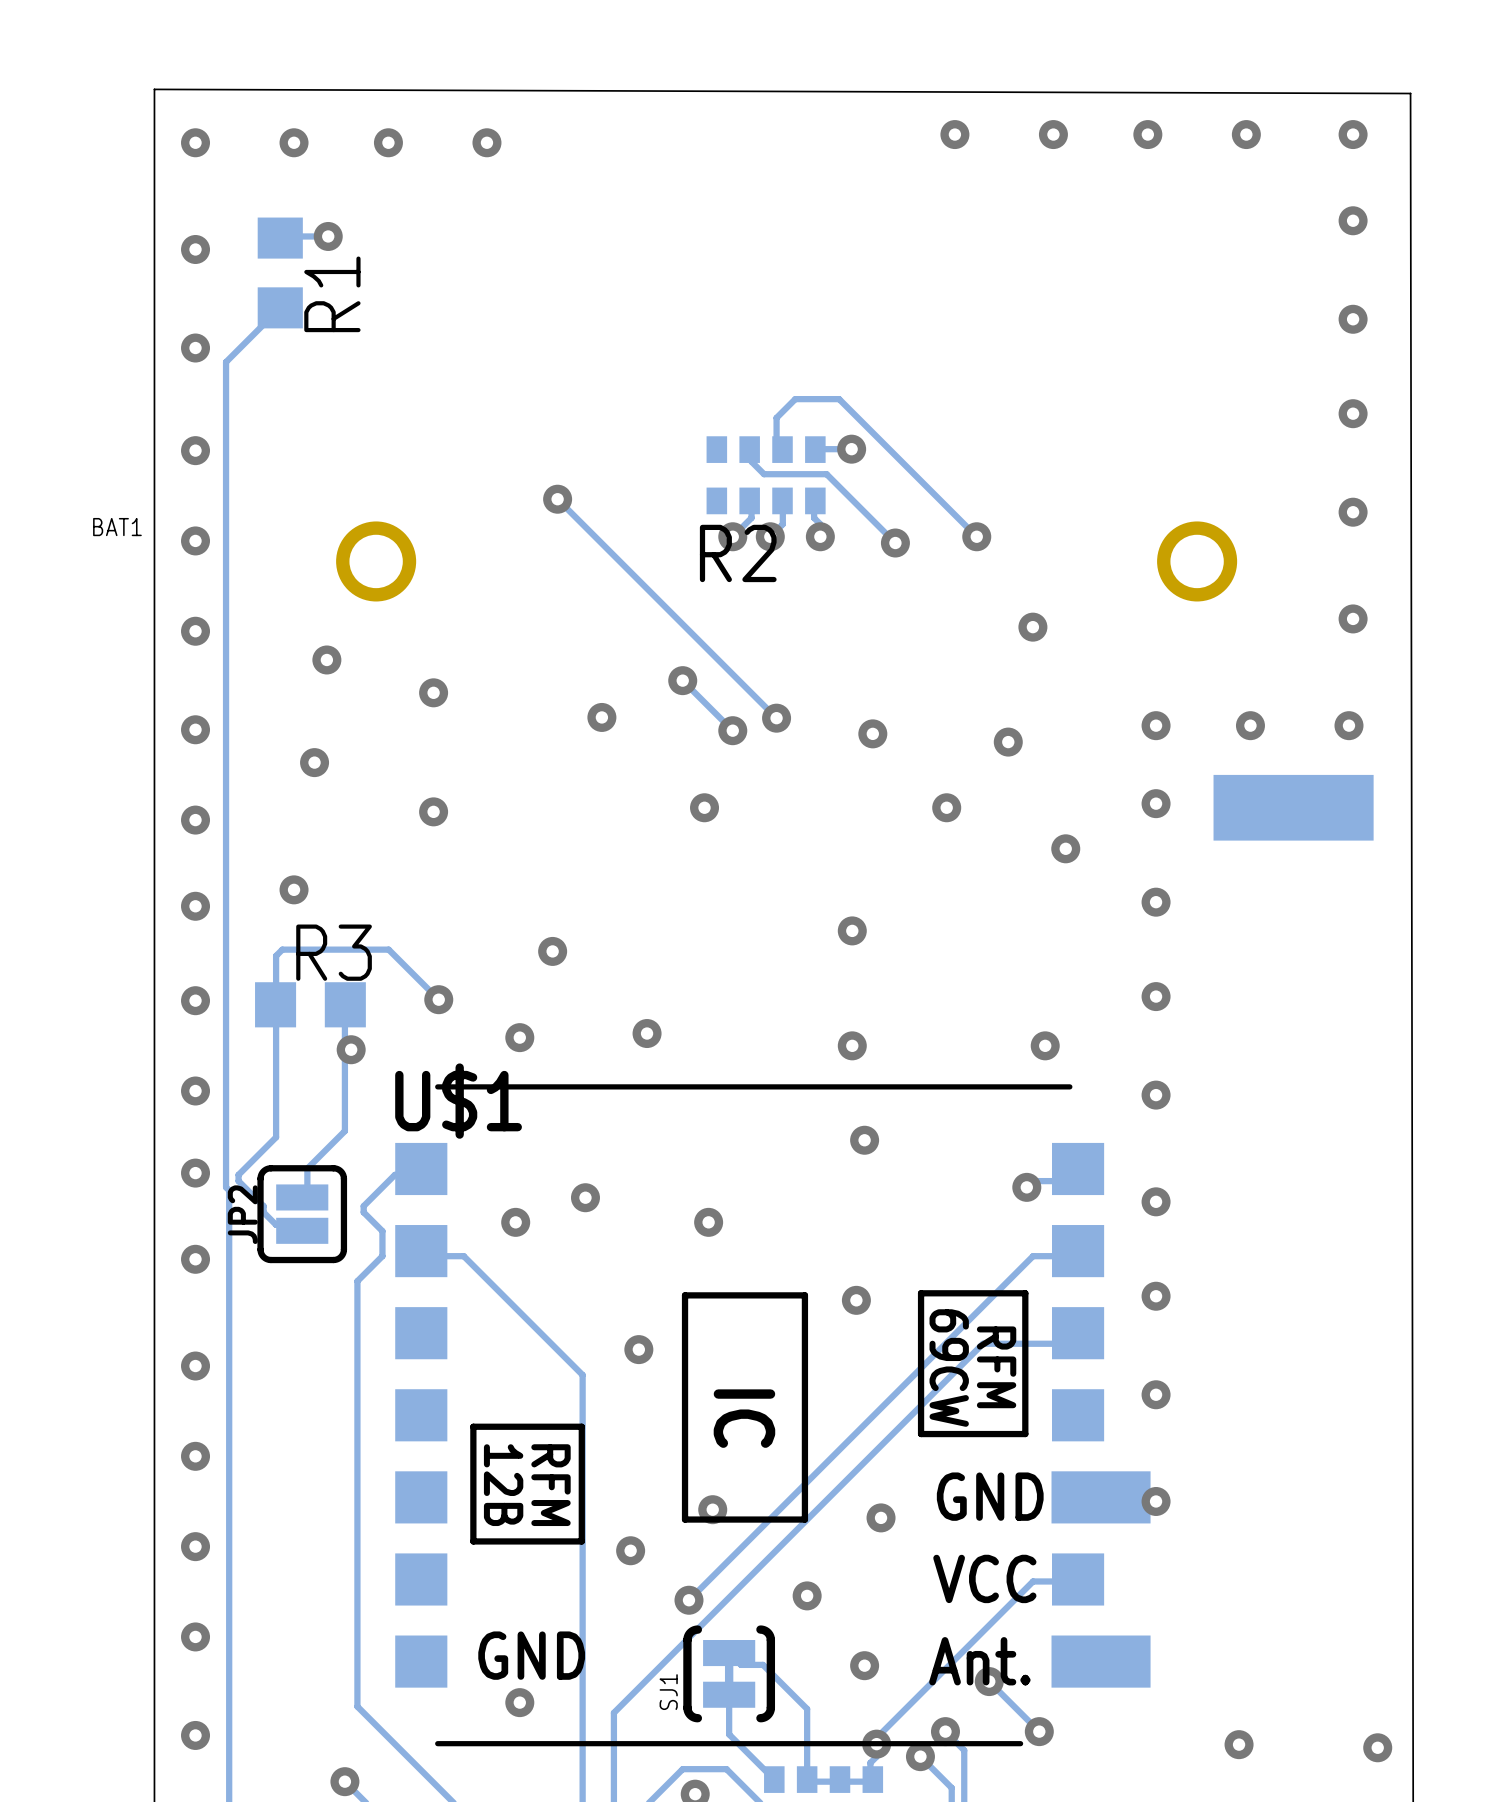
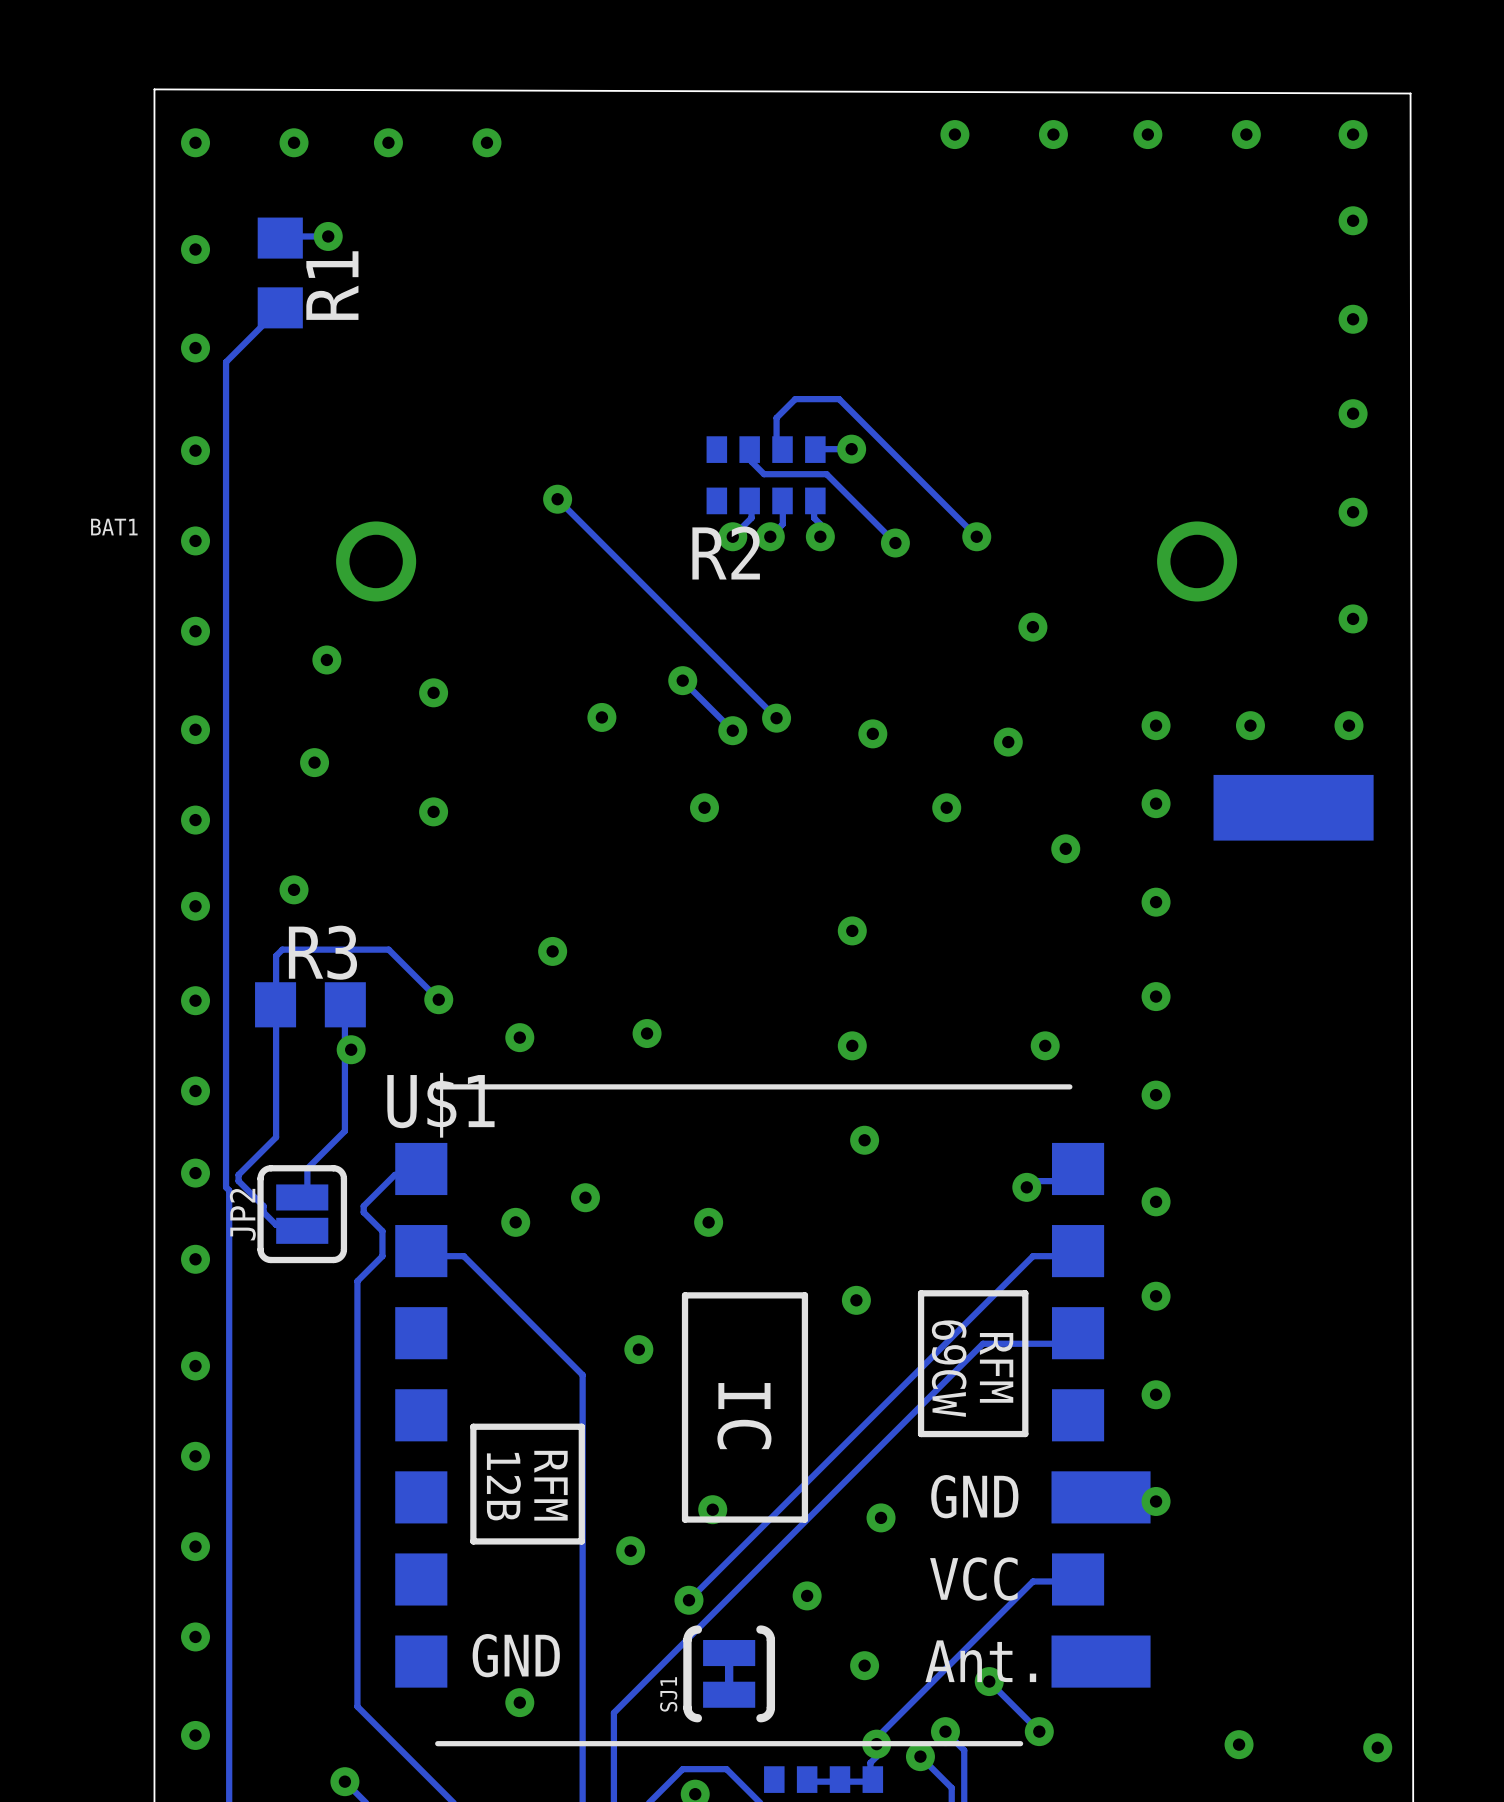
track: (729, 1653) (741, 1664) (763, 1664) (807, 1709) (807, 1779) -> none
track: (729, 1694) (729, 1734) (774, 1779) -> none

